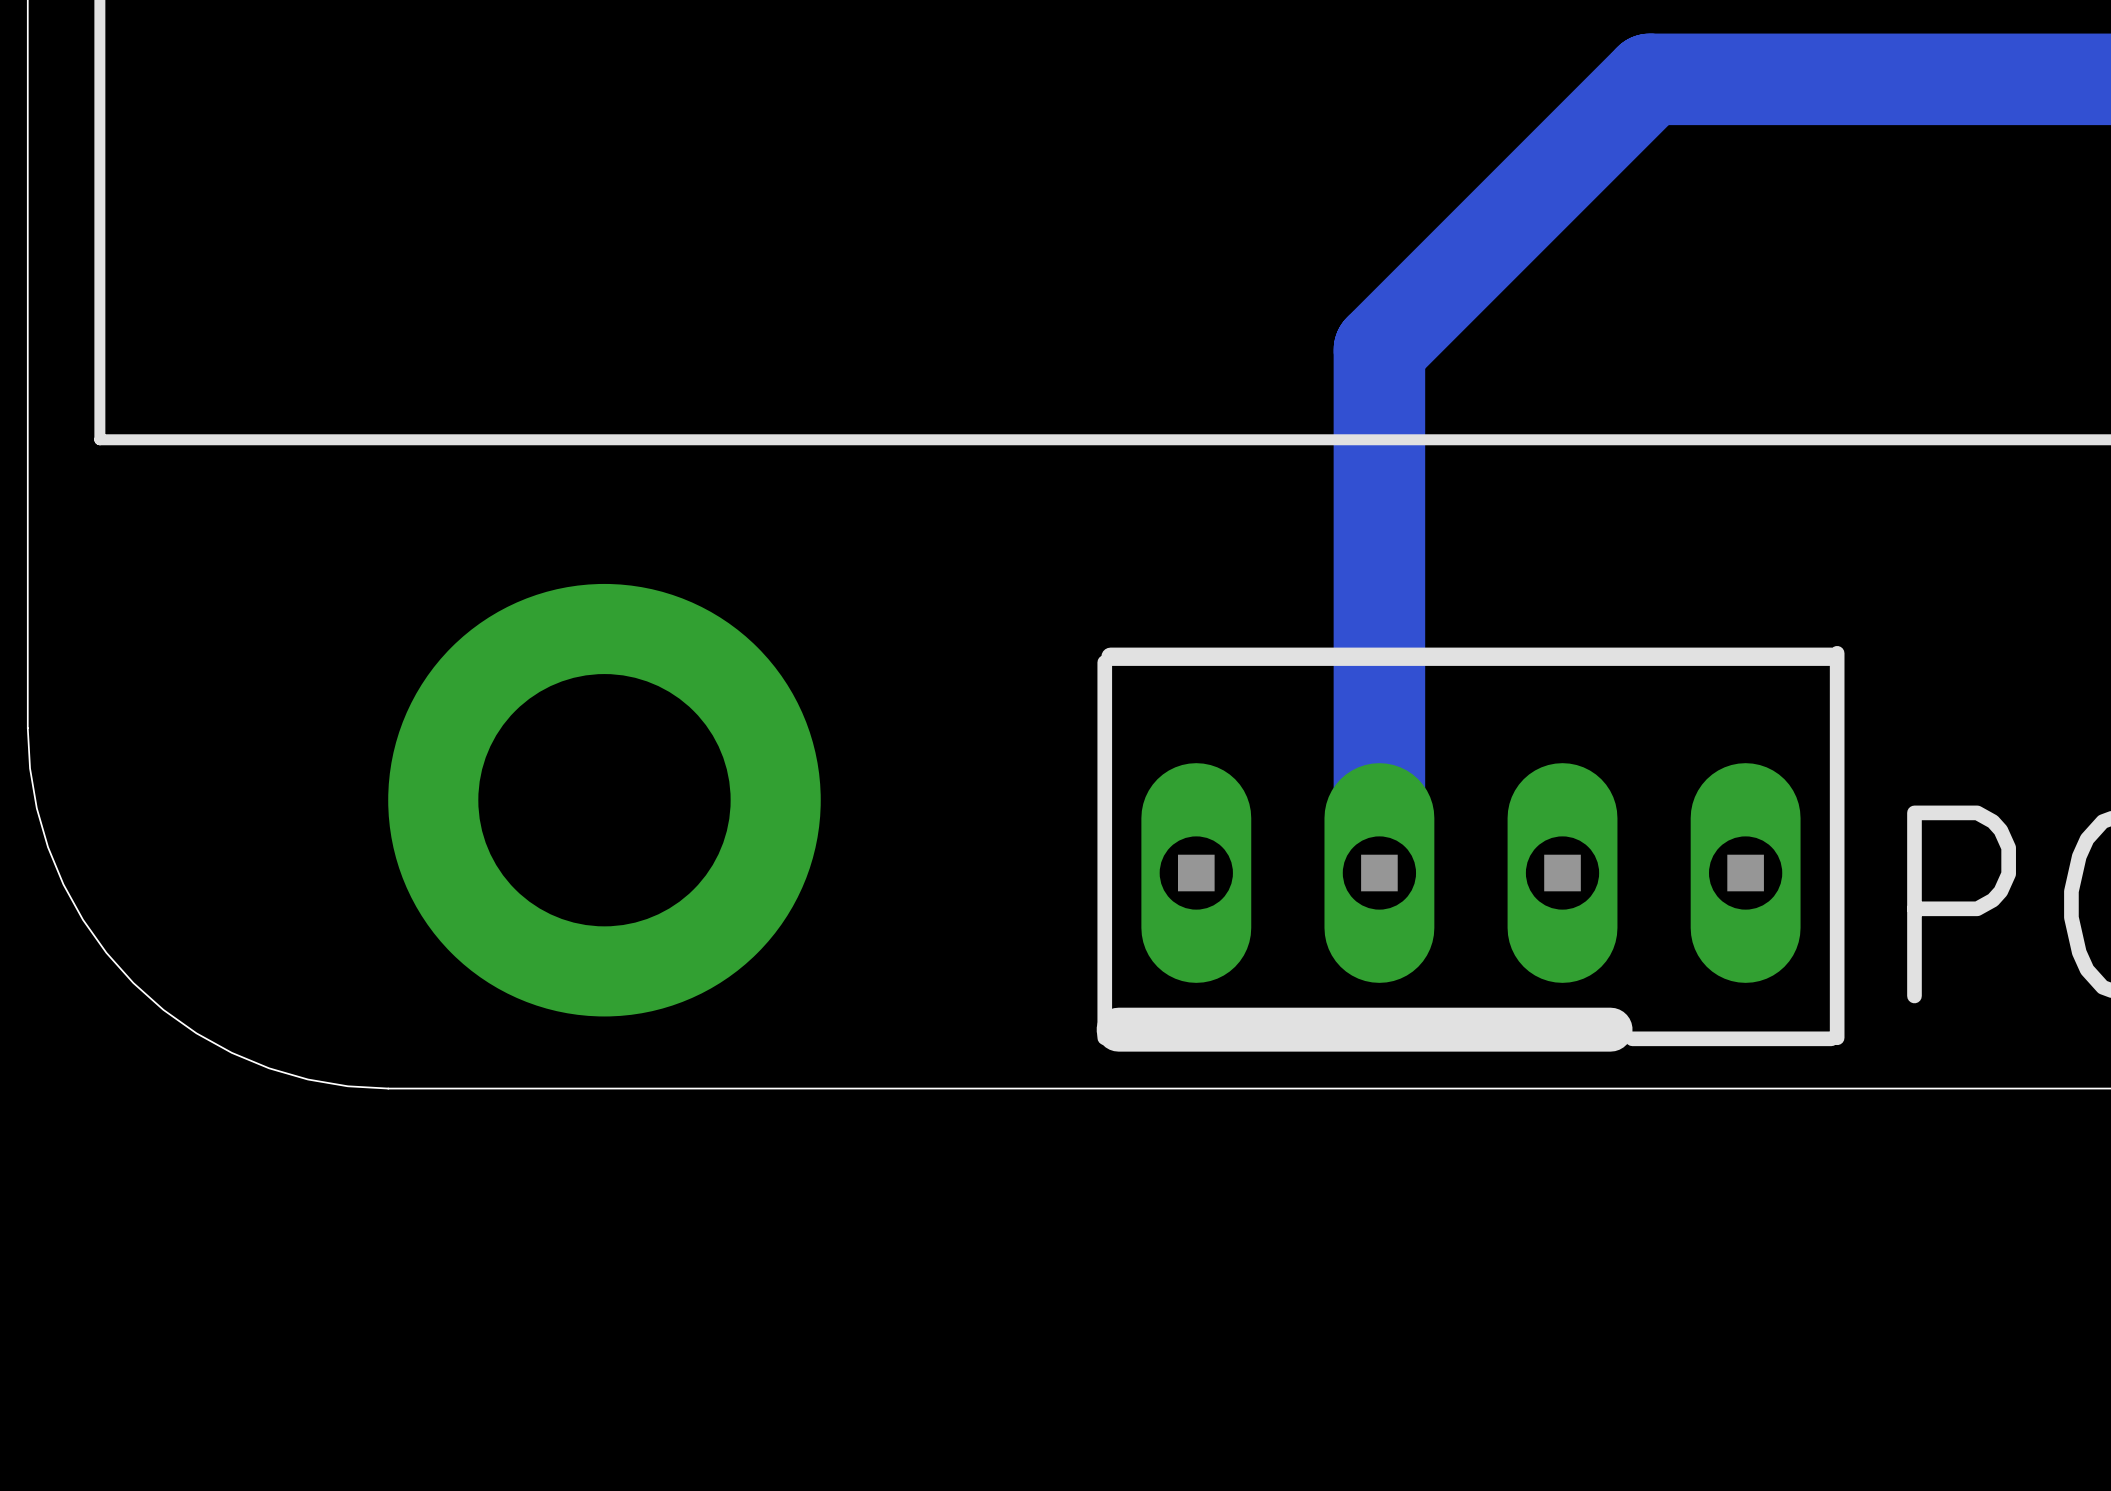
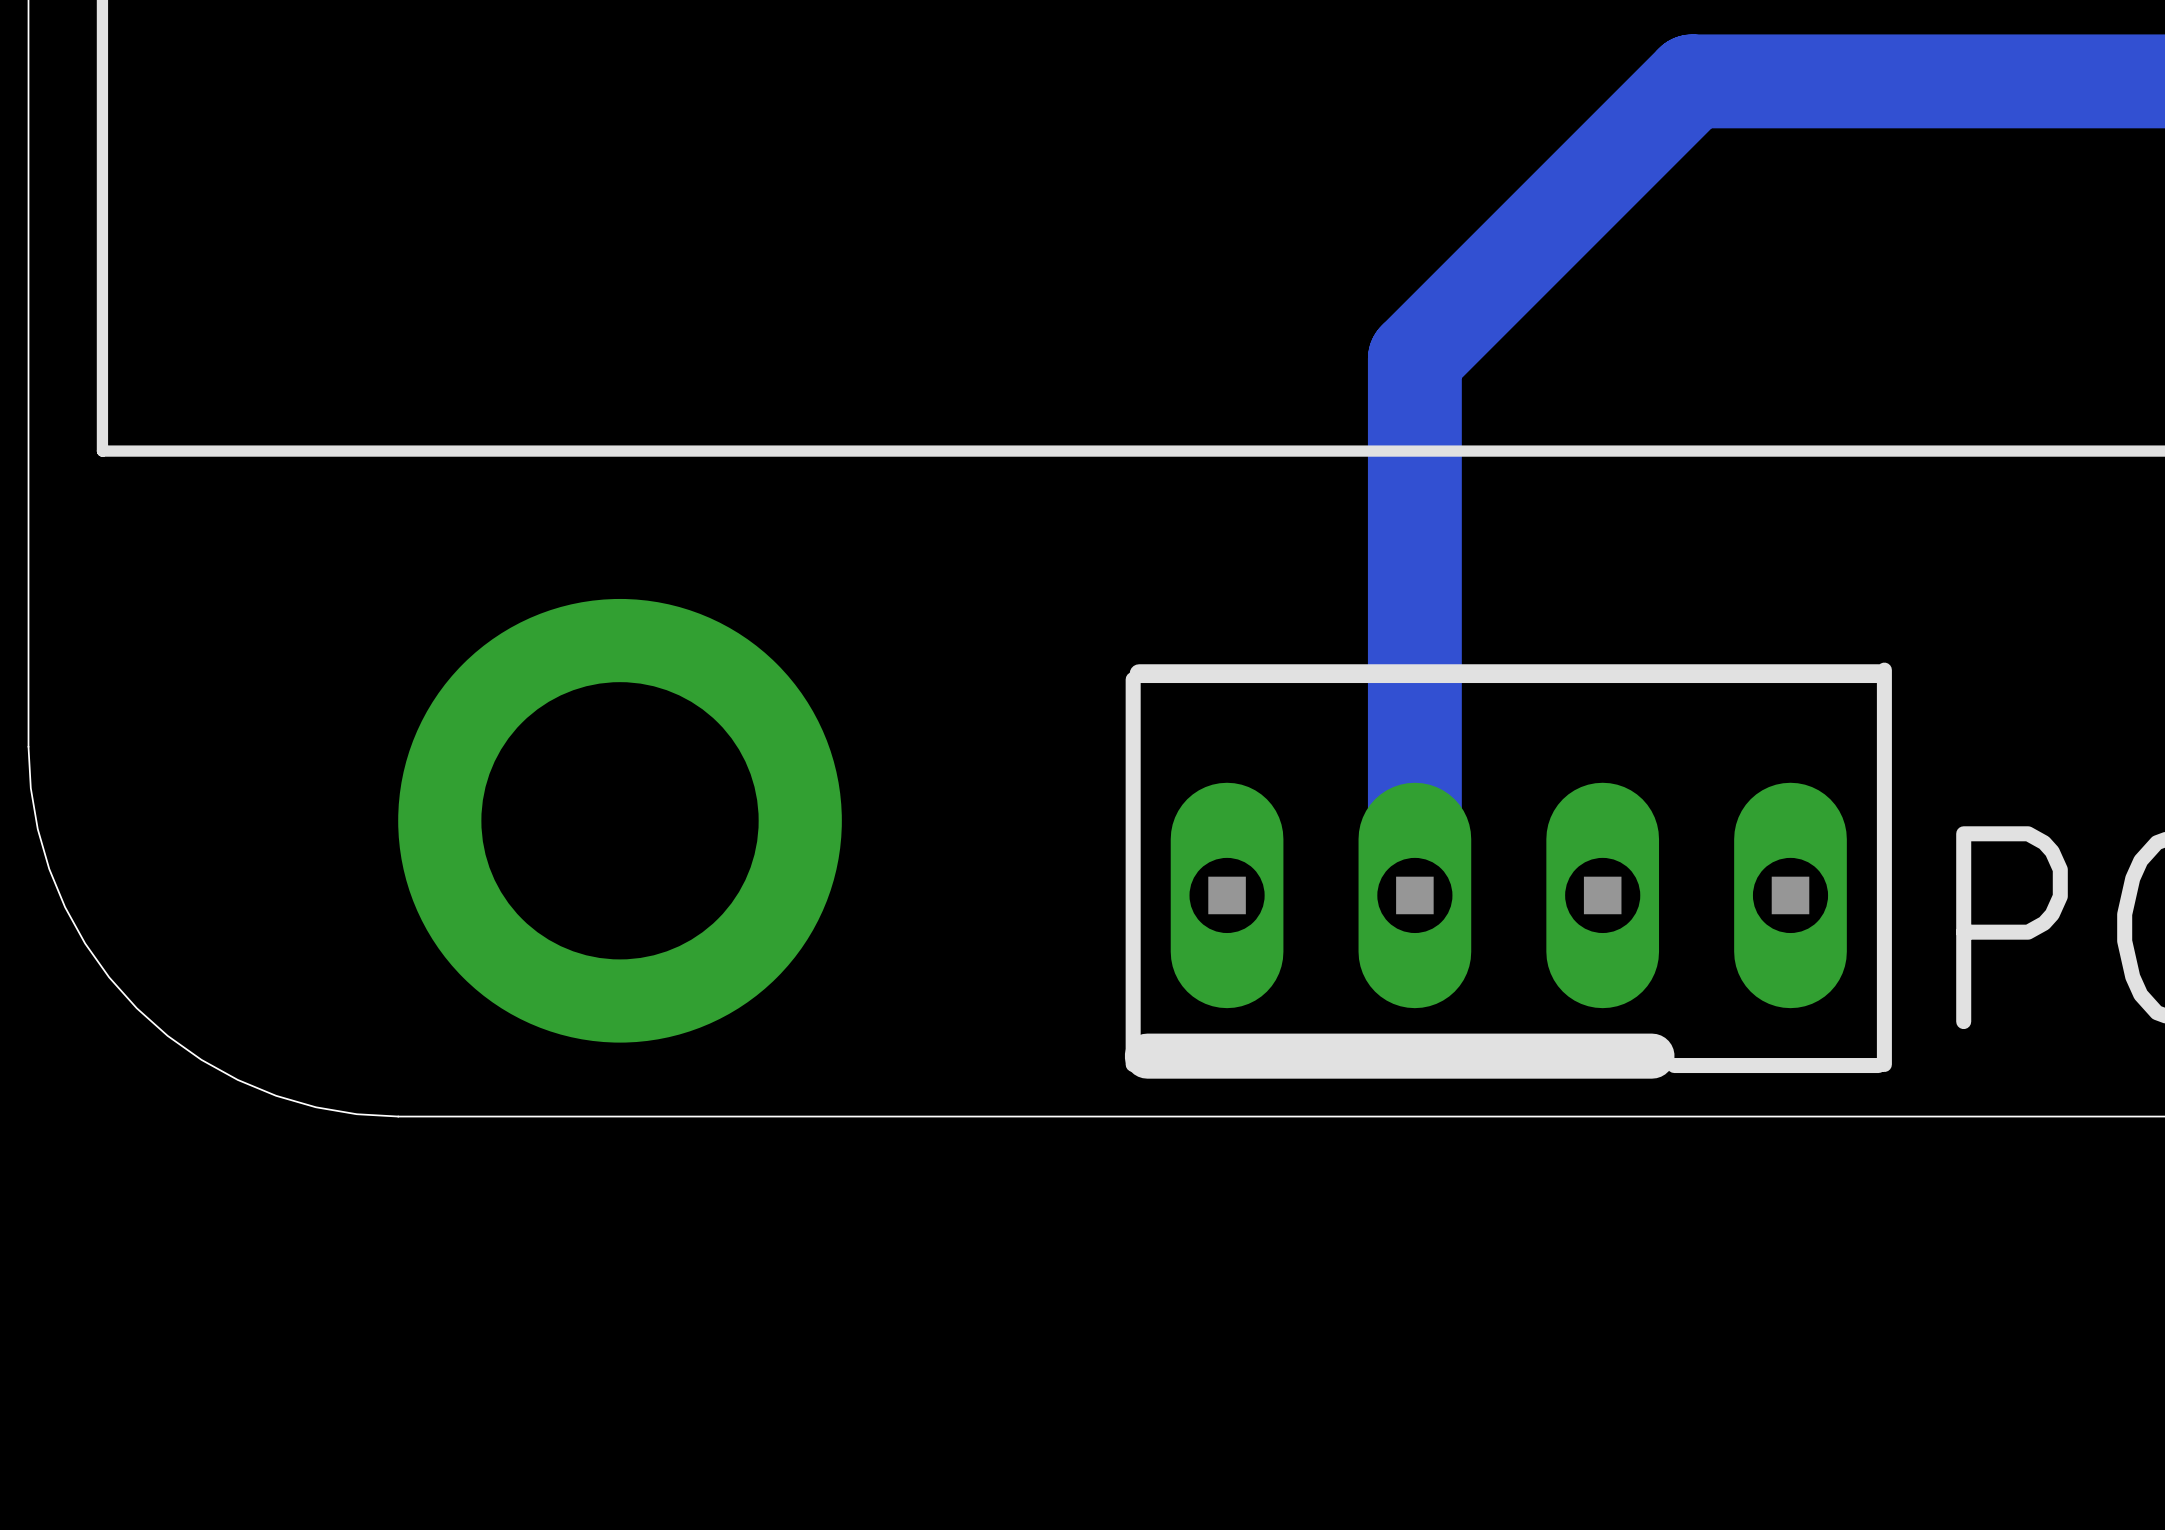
part footprint: [388, 583, 821, 1017] -> [398, 598, 842, 1043]

